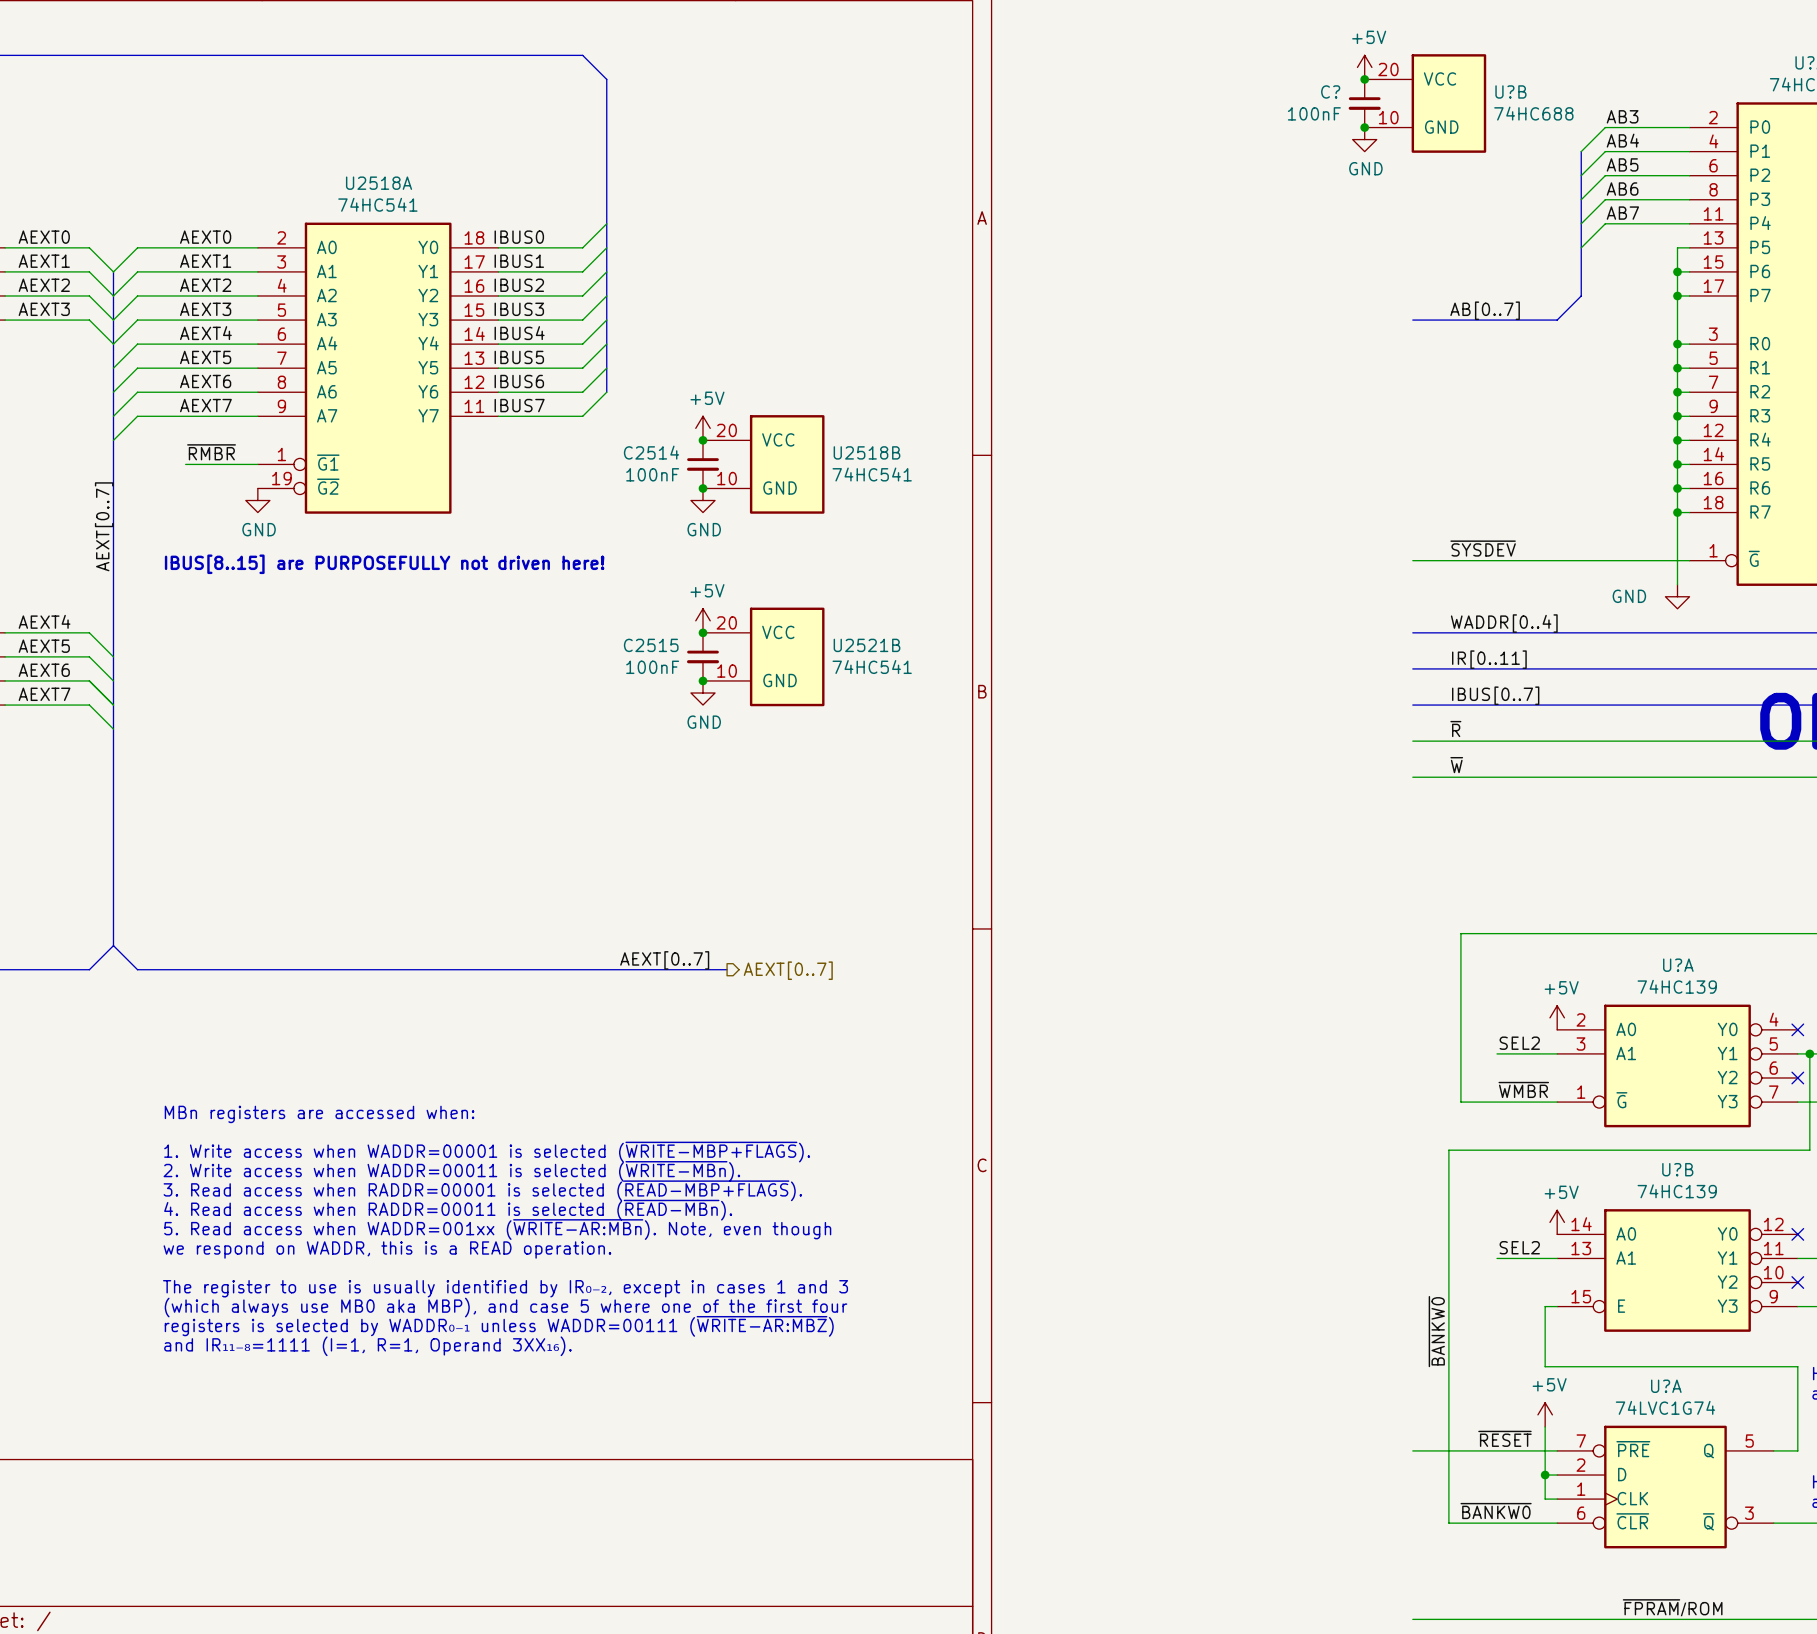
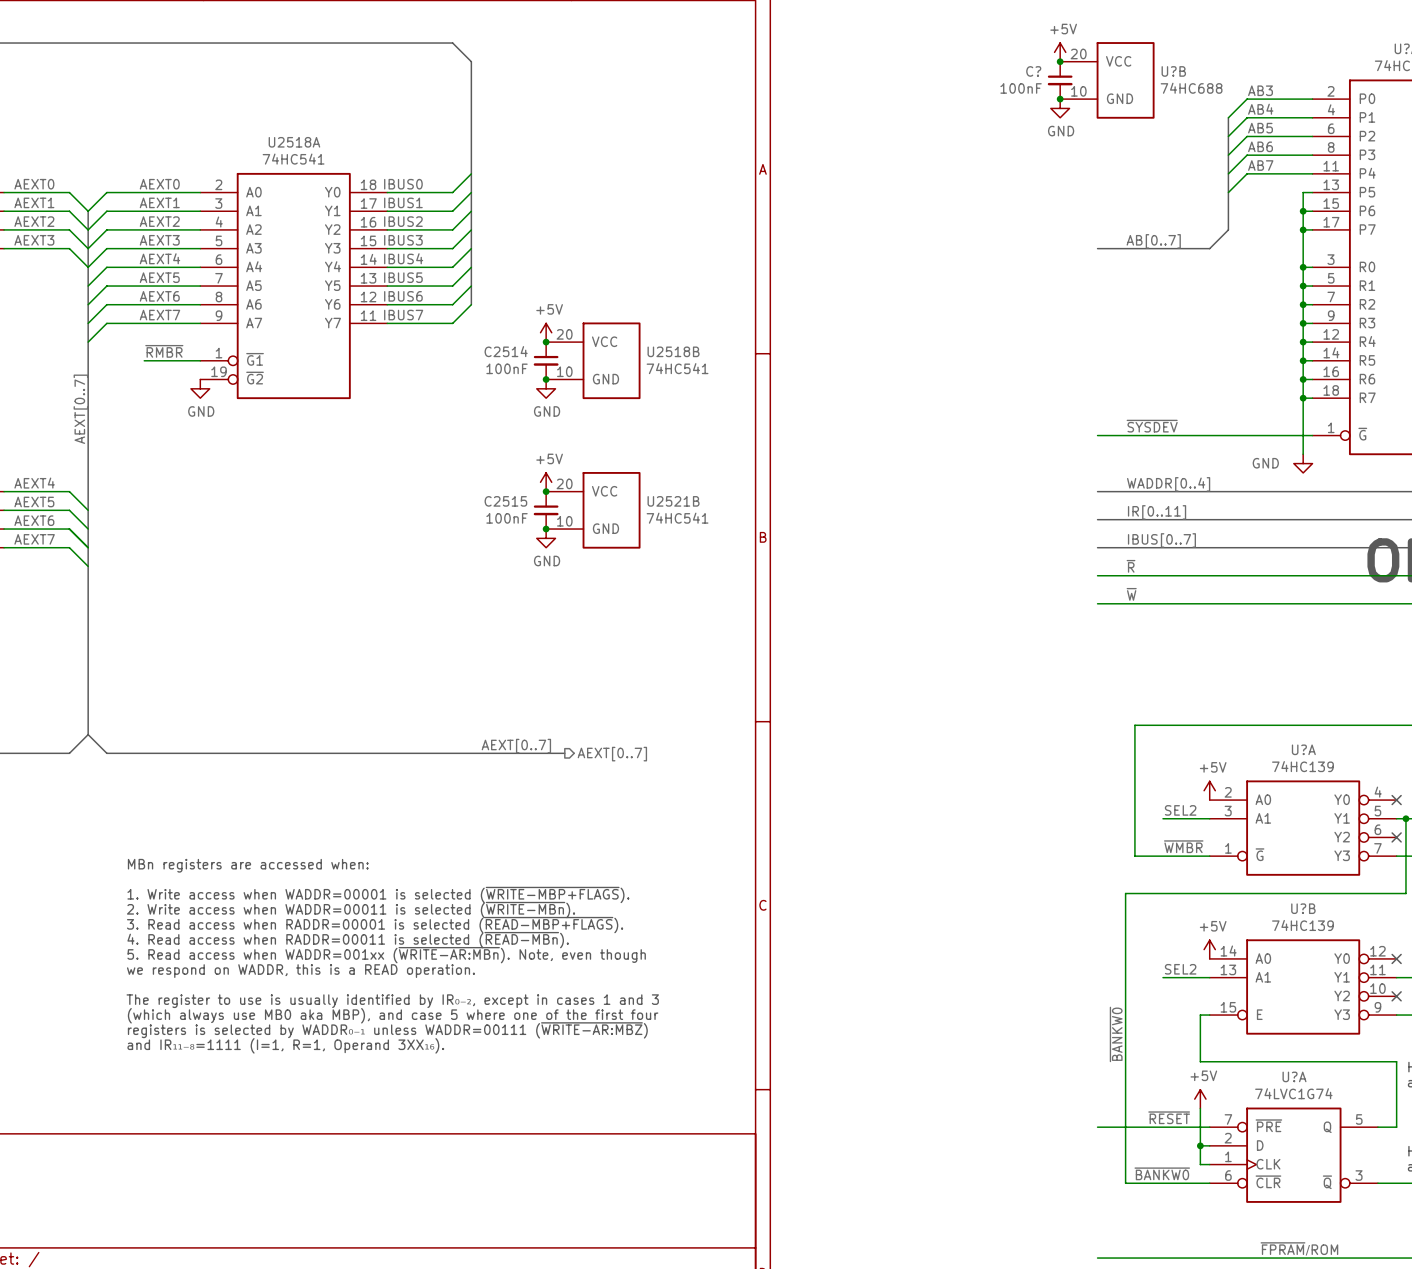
text: IBUS[8..15] are PURPOSEFULLY not driven here! (384, 564) -> none

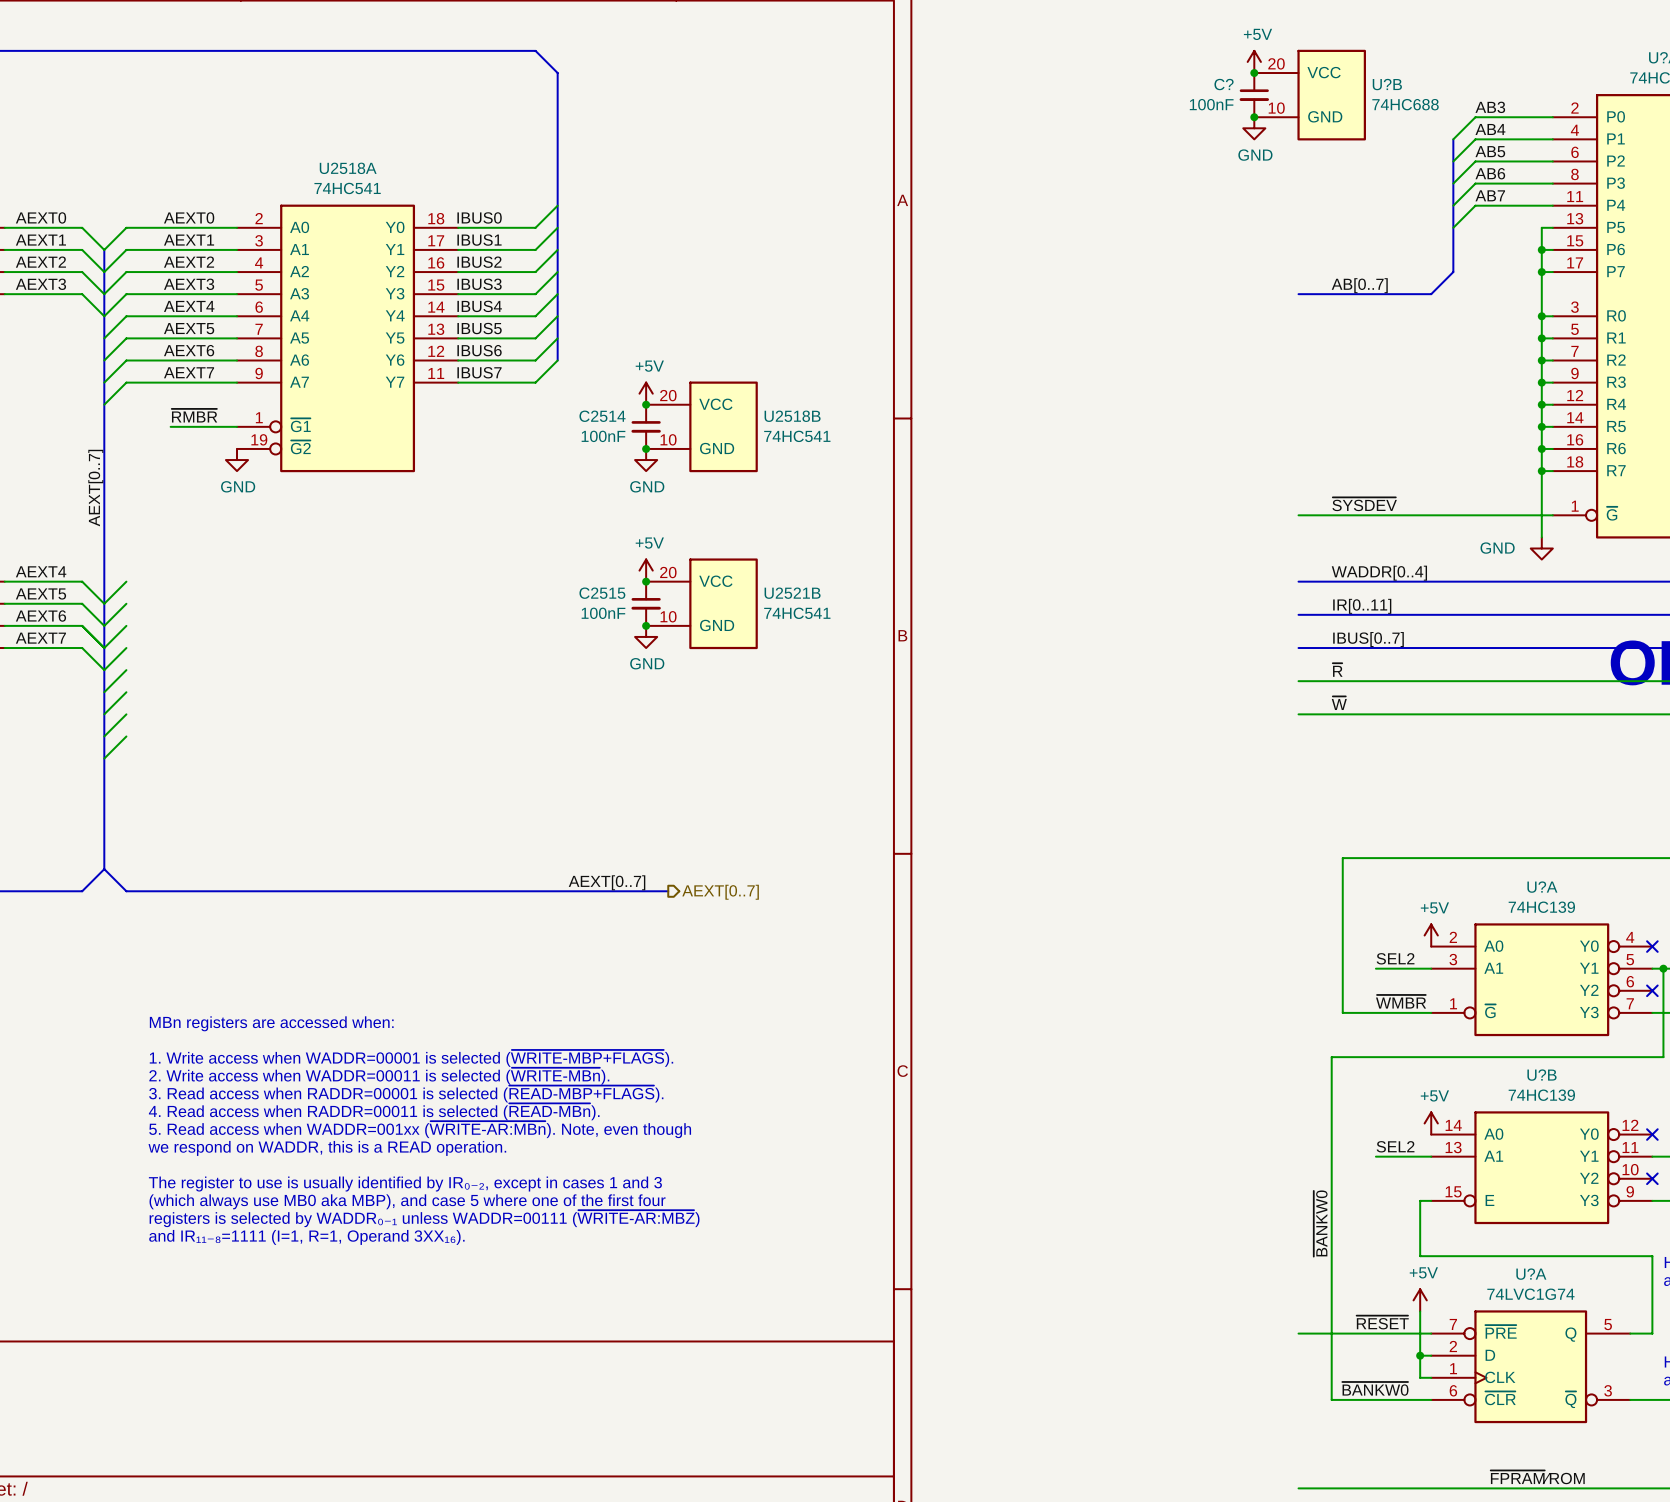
wire: none -> (126, 581) (104, 603)
wire: none -> (126, 603) (104, 625)
wire: none -> (126, 625) (104, 648)
wire: none -> (126, 648) (104, 670)
wire: none -> (126, 670) (104, 692)
wire: none -> (126, 692) (104, 714)
wire: none -> (126, 714) (104, 736)
wire: none -> (126, 736) (104, 758)

